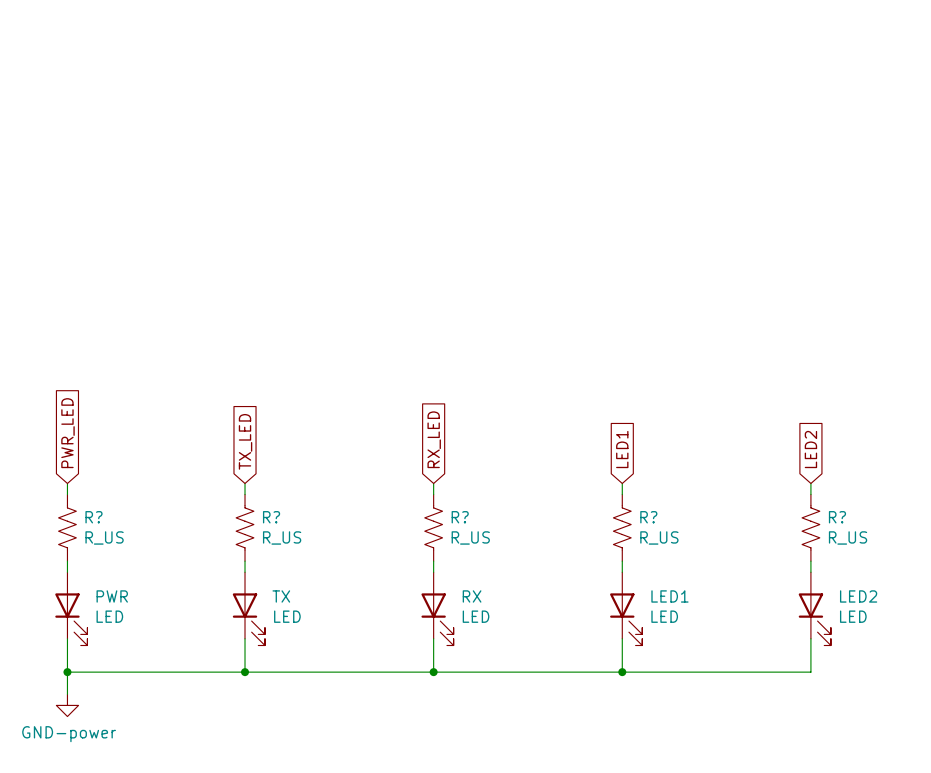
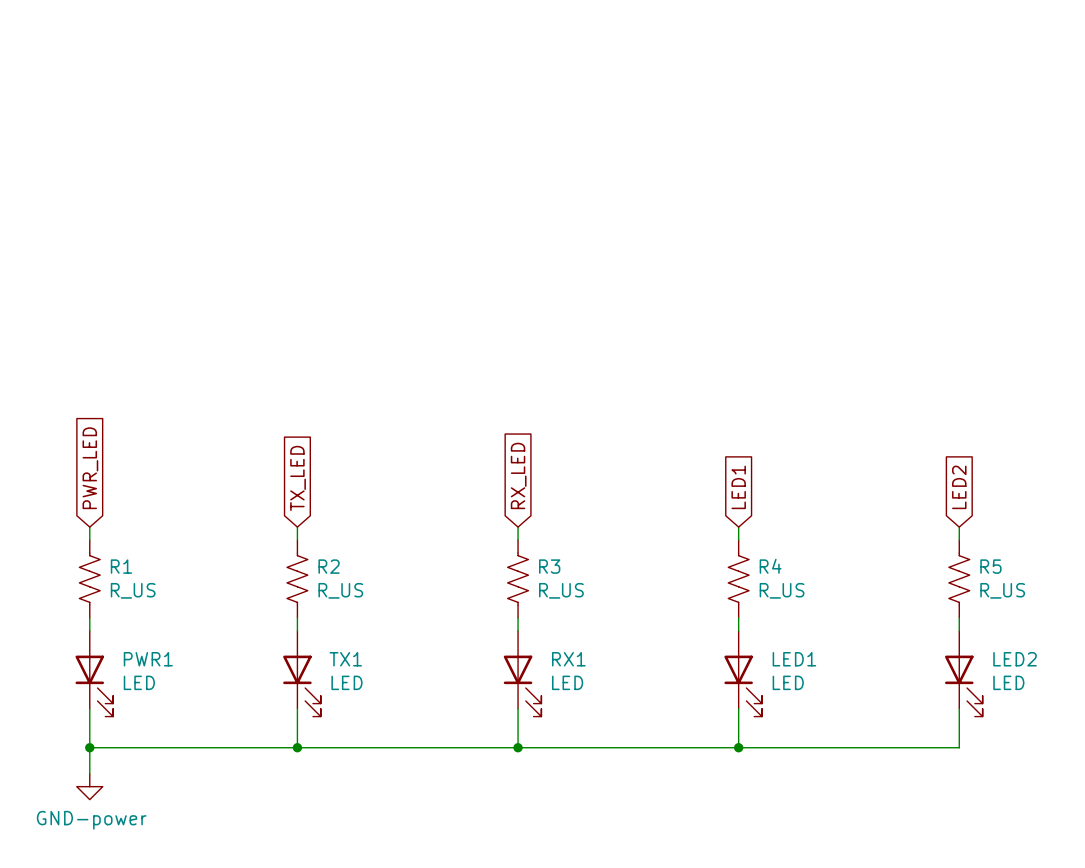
R? name: R? (93, 517) -> R1 (121, 566)
R? name: R? (271, 517) -> R2 (329, 566)
R? name: R? (460, 517) -> R3 (549, 566)
R? name: R? (648, 517) -> R4 (770, 566)
R? name: R? (837, 517) -> R5 (990, 566)
PWR name: PWR (112, 596) -> PWR1 (148, 659)
TX name: TX (281, 596) -> TX1 (345, 659)
RX name: RX (472, 596) -> RX1 (568, 659)

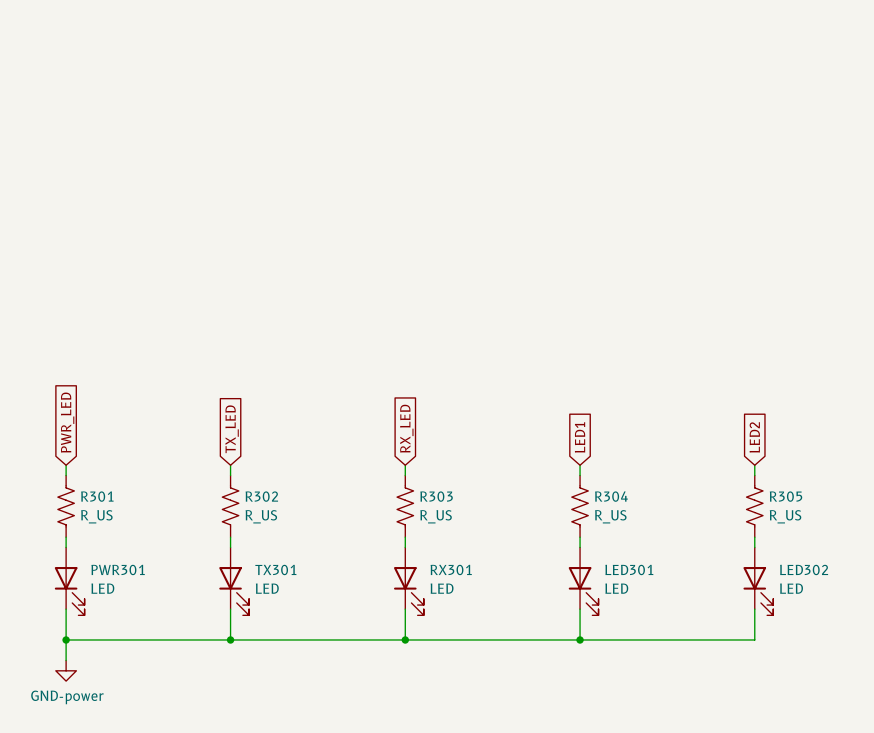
R1 name: R1 (121, 566) -> R301 (97, 496)
R2 name: R2 (329, 566) -> R302 (261, 496)
R3 name: R3 (549, 566) -> R303 (436, 496)
R4 name: R4 (770, 566) -> R304 (611, 496)
R5 name: R5 (990, 566) -> R305 (786, 496)
PWR1 name: PWR1 (148, 659) -> PWR301 (118, 569)
TX1 name: TX1 (345, 659) -> TX301 (275, 569)
RX1 name: RX1 (568, 659) -> RX301 (451, 569)
LED1 name: LED1 (794, 659) -> LED301 (629, 569)
LED2 name: LED2 (1015, 659) -> LED302 (804, 569)

